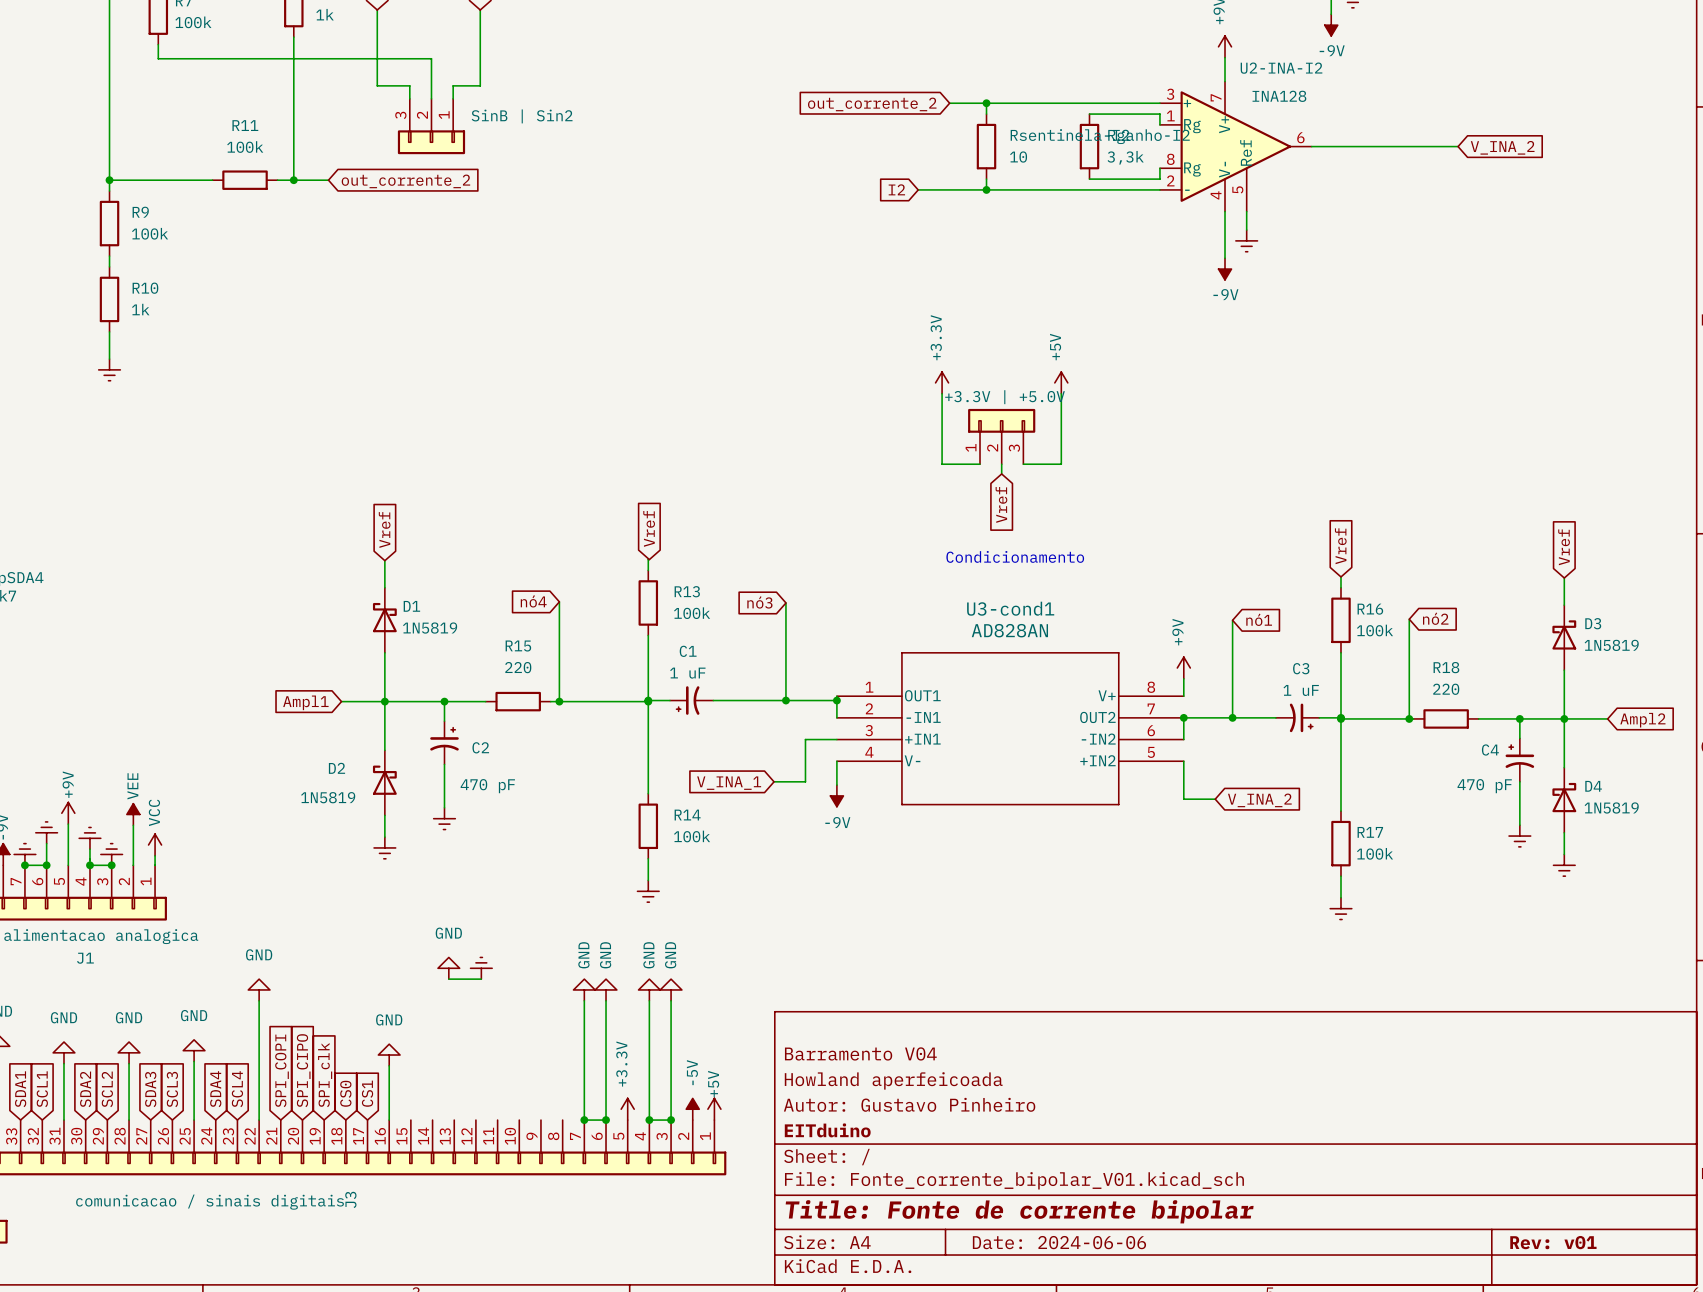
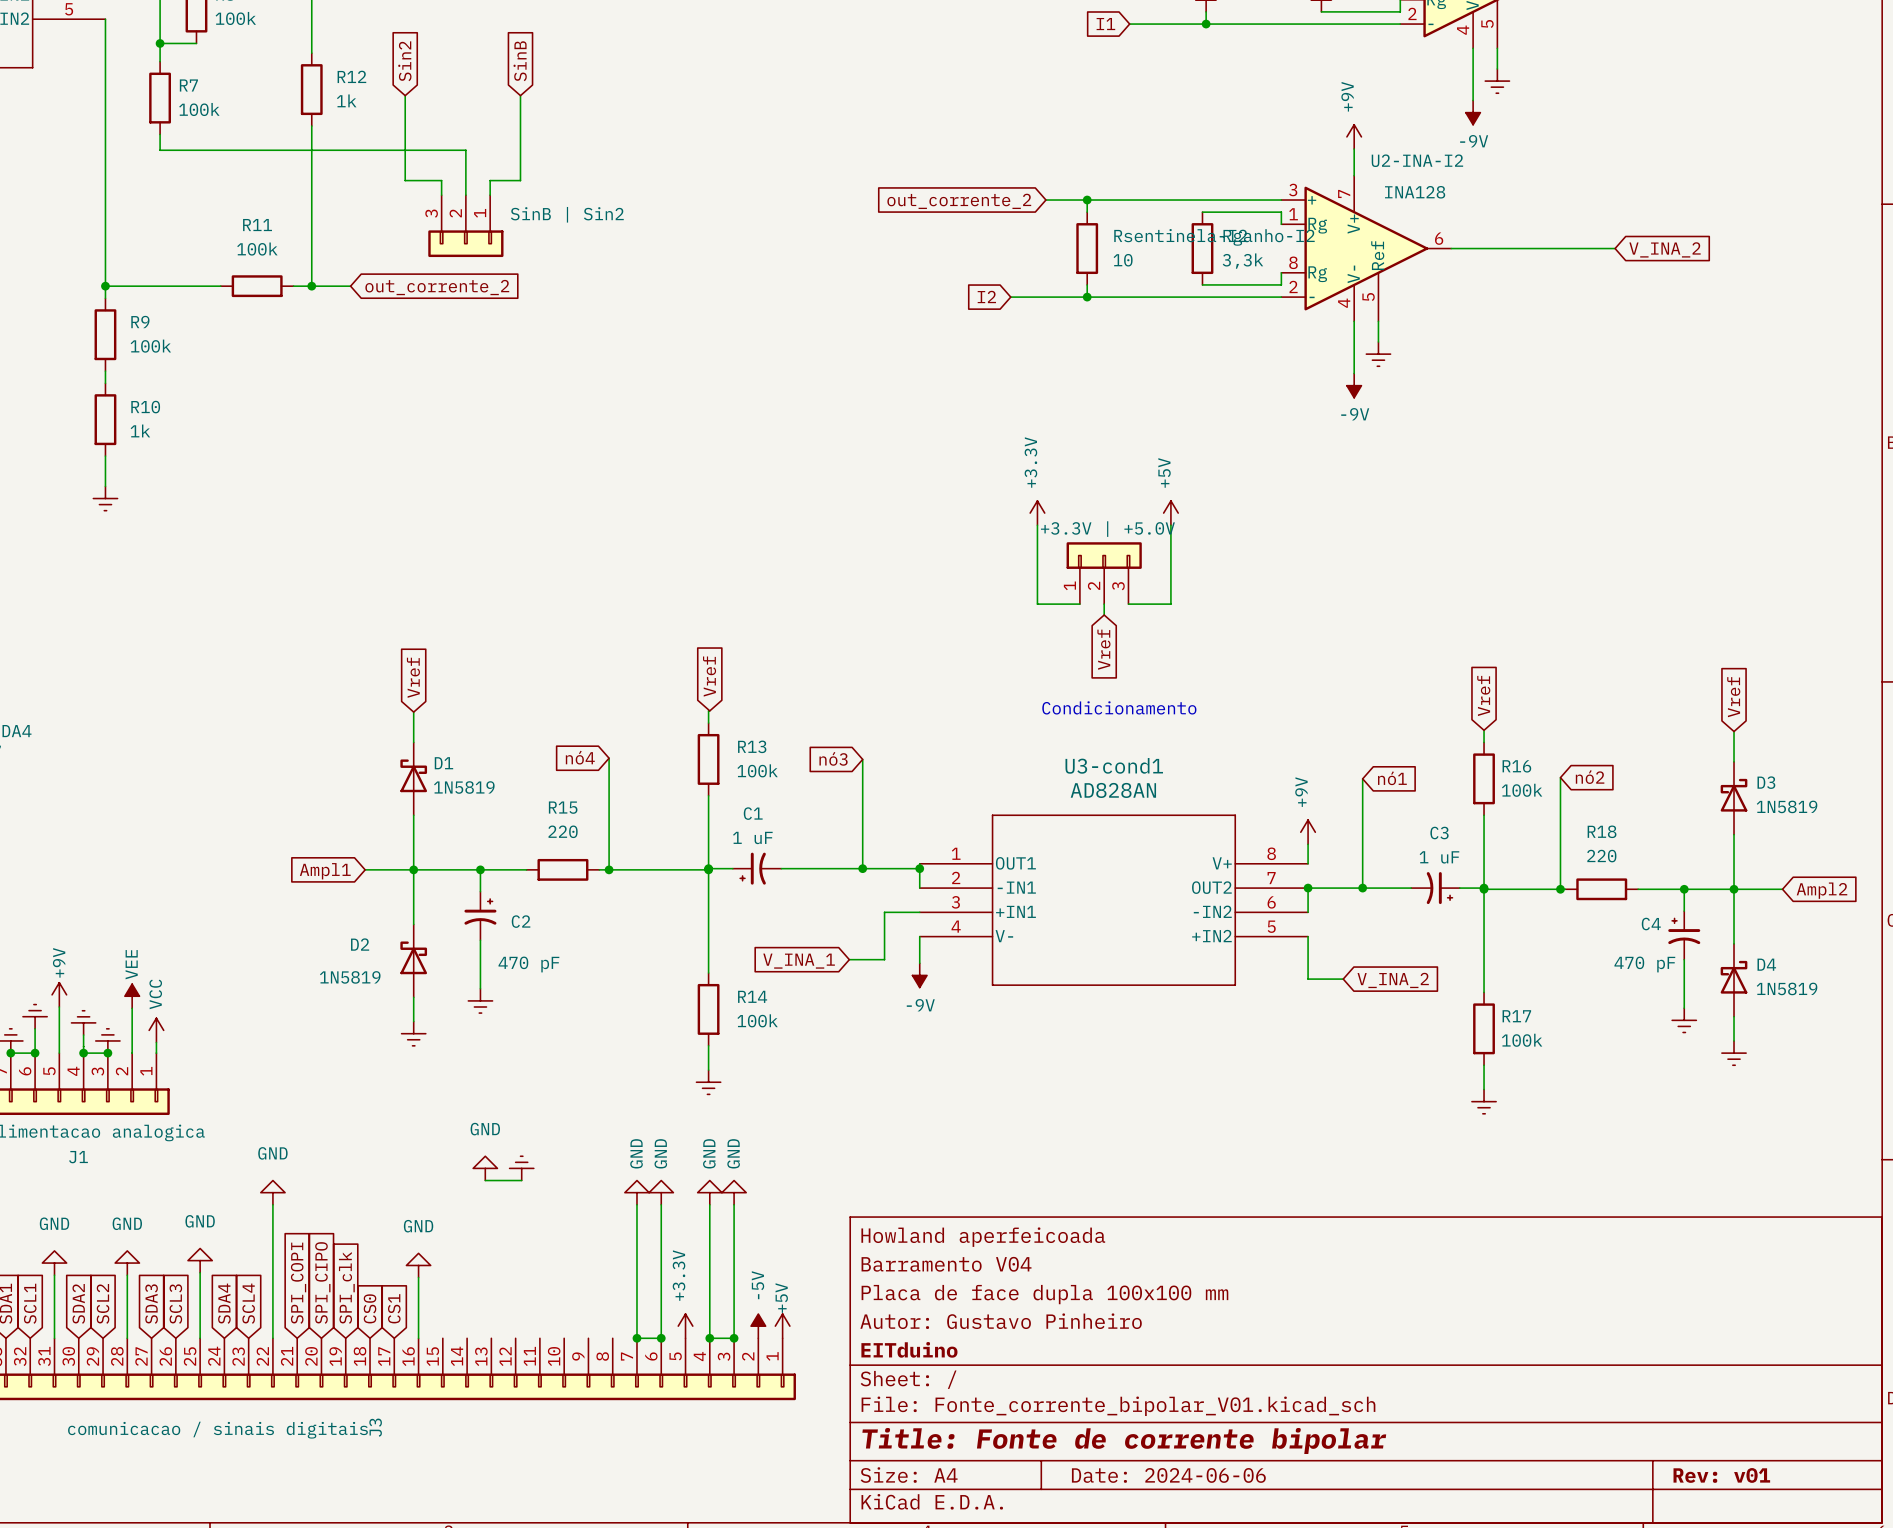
title block: none -> Howland aperfeicoada (983, 1237)
title block: Howland aperfeicoada (893, 1080) -> Placa de face dupla 100x100 mm (1044, 1294)

